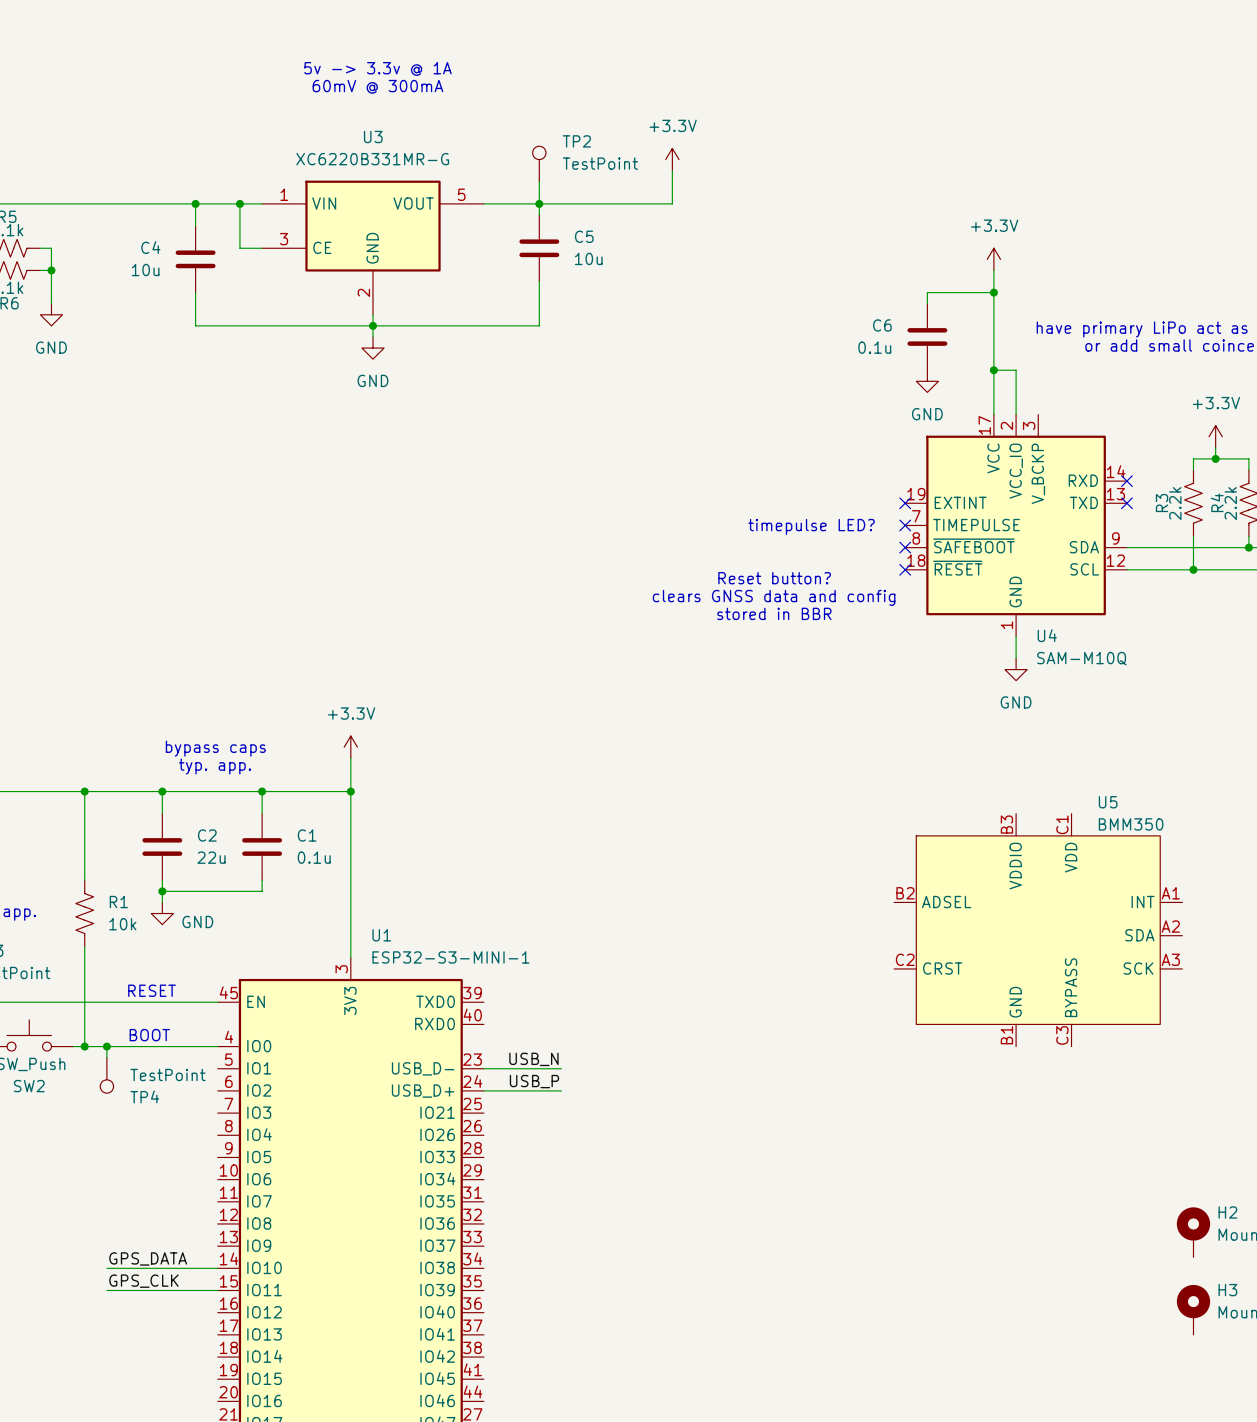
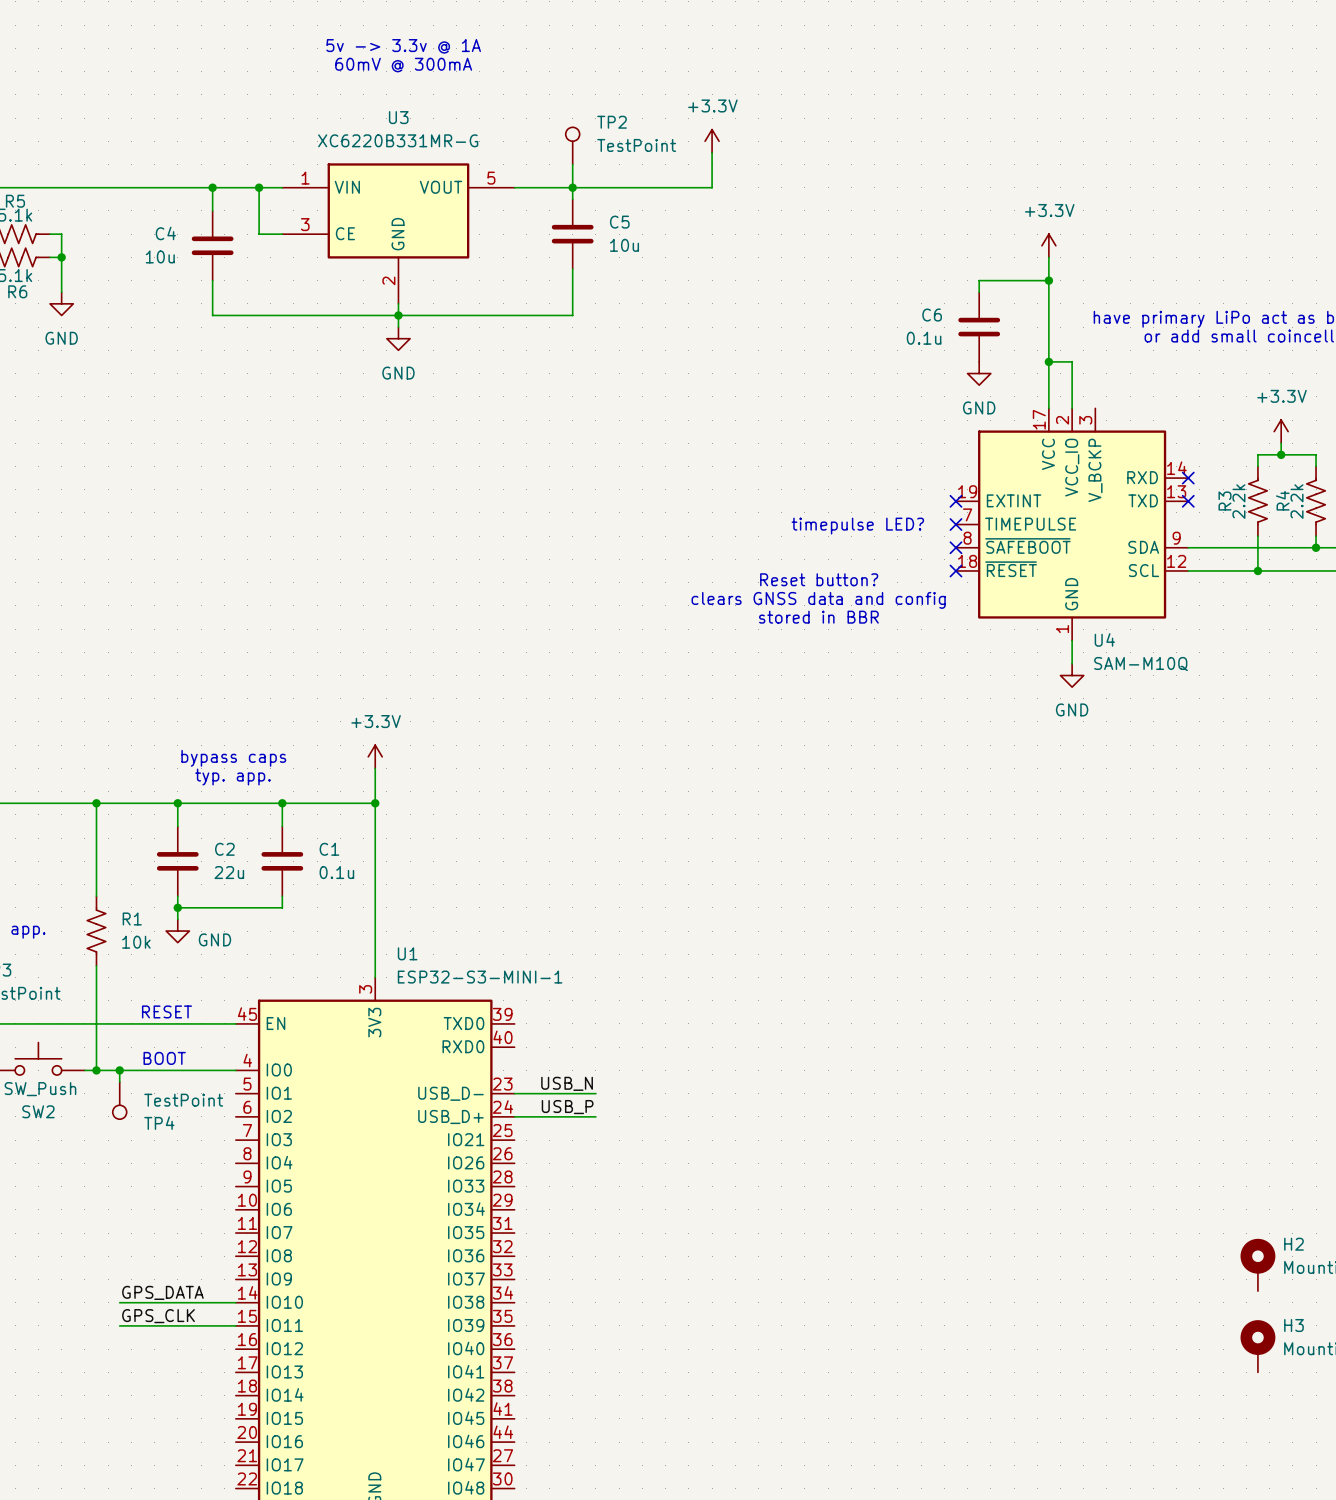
U5: BMM350 (1038, 930) -> none

